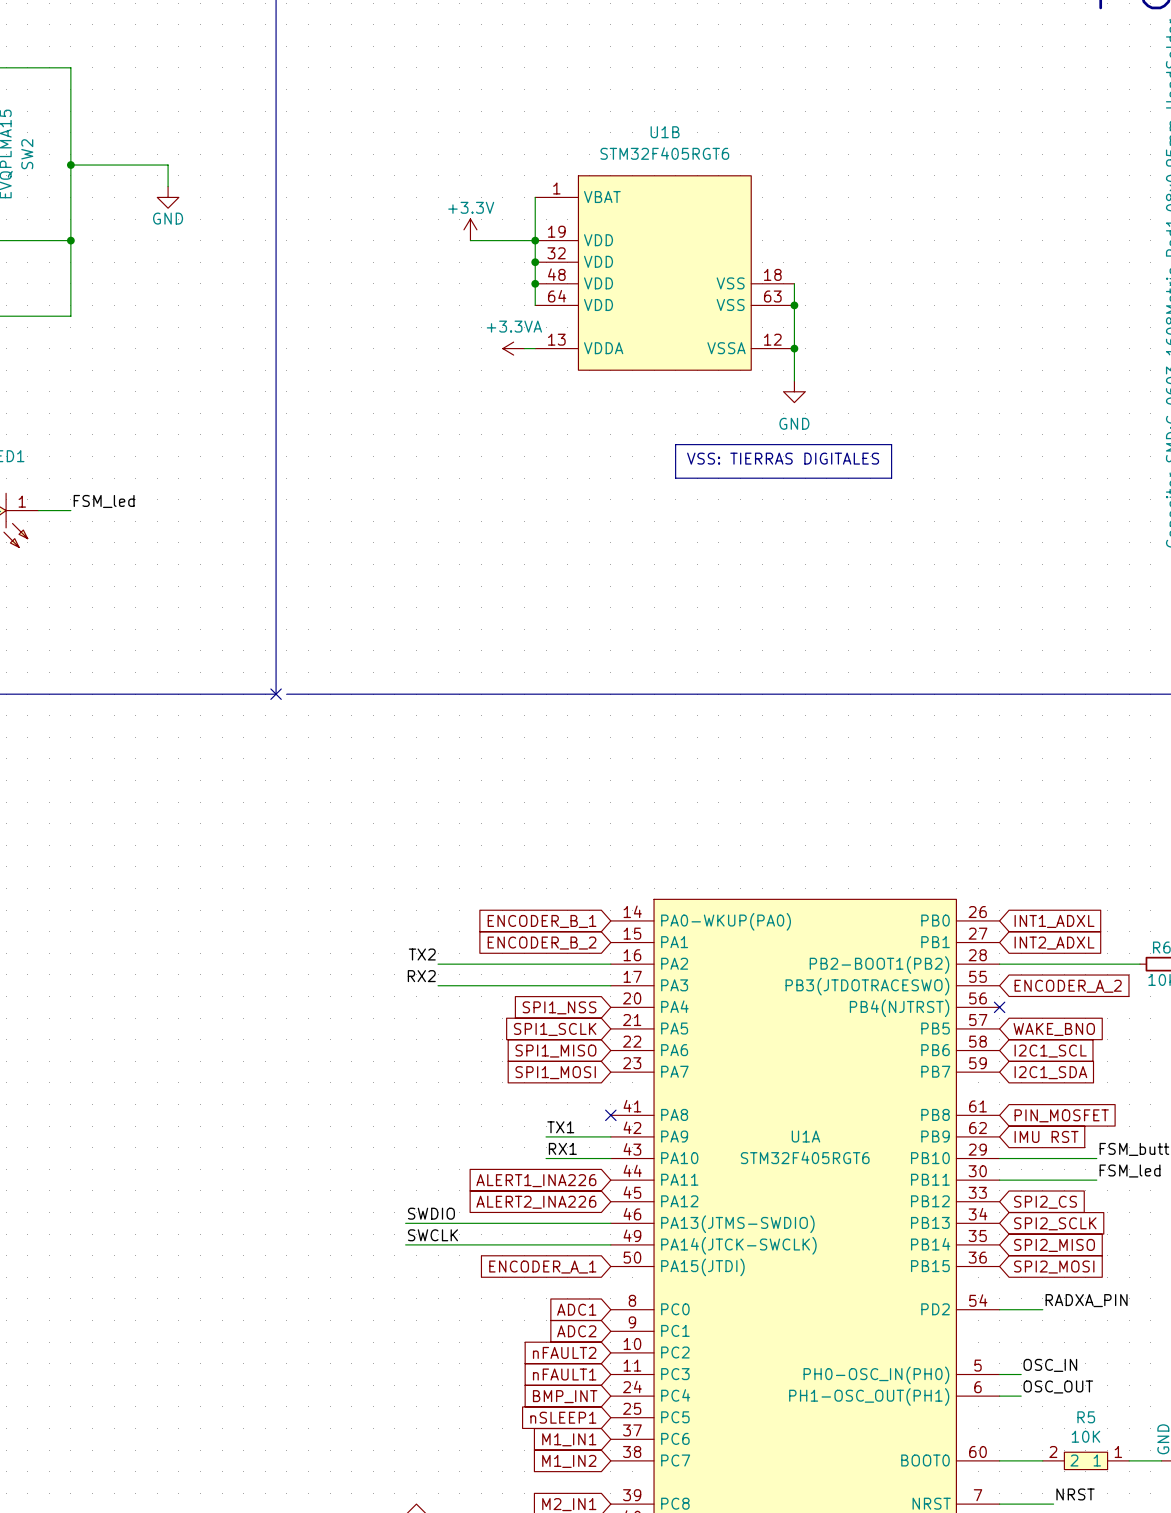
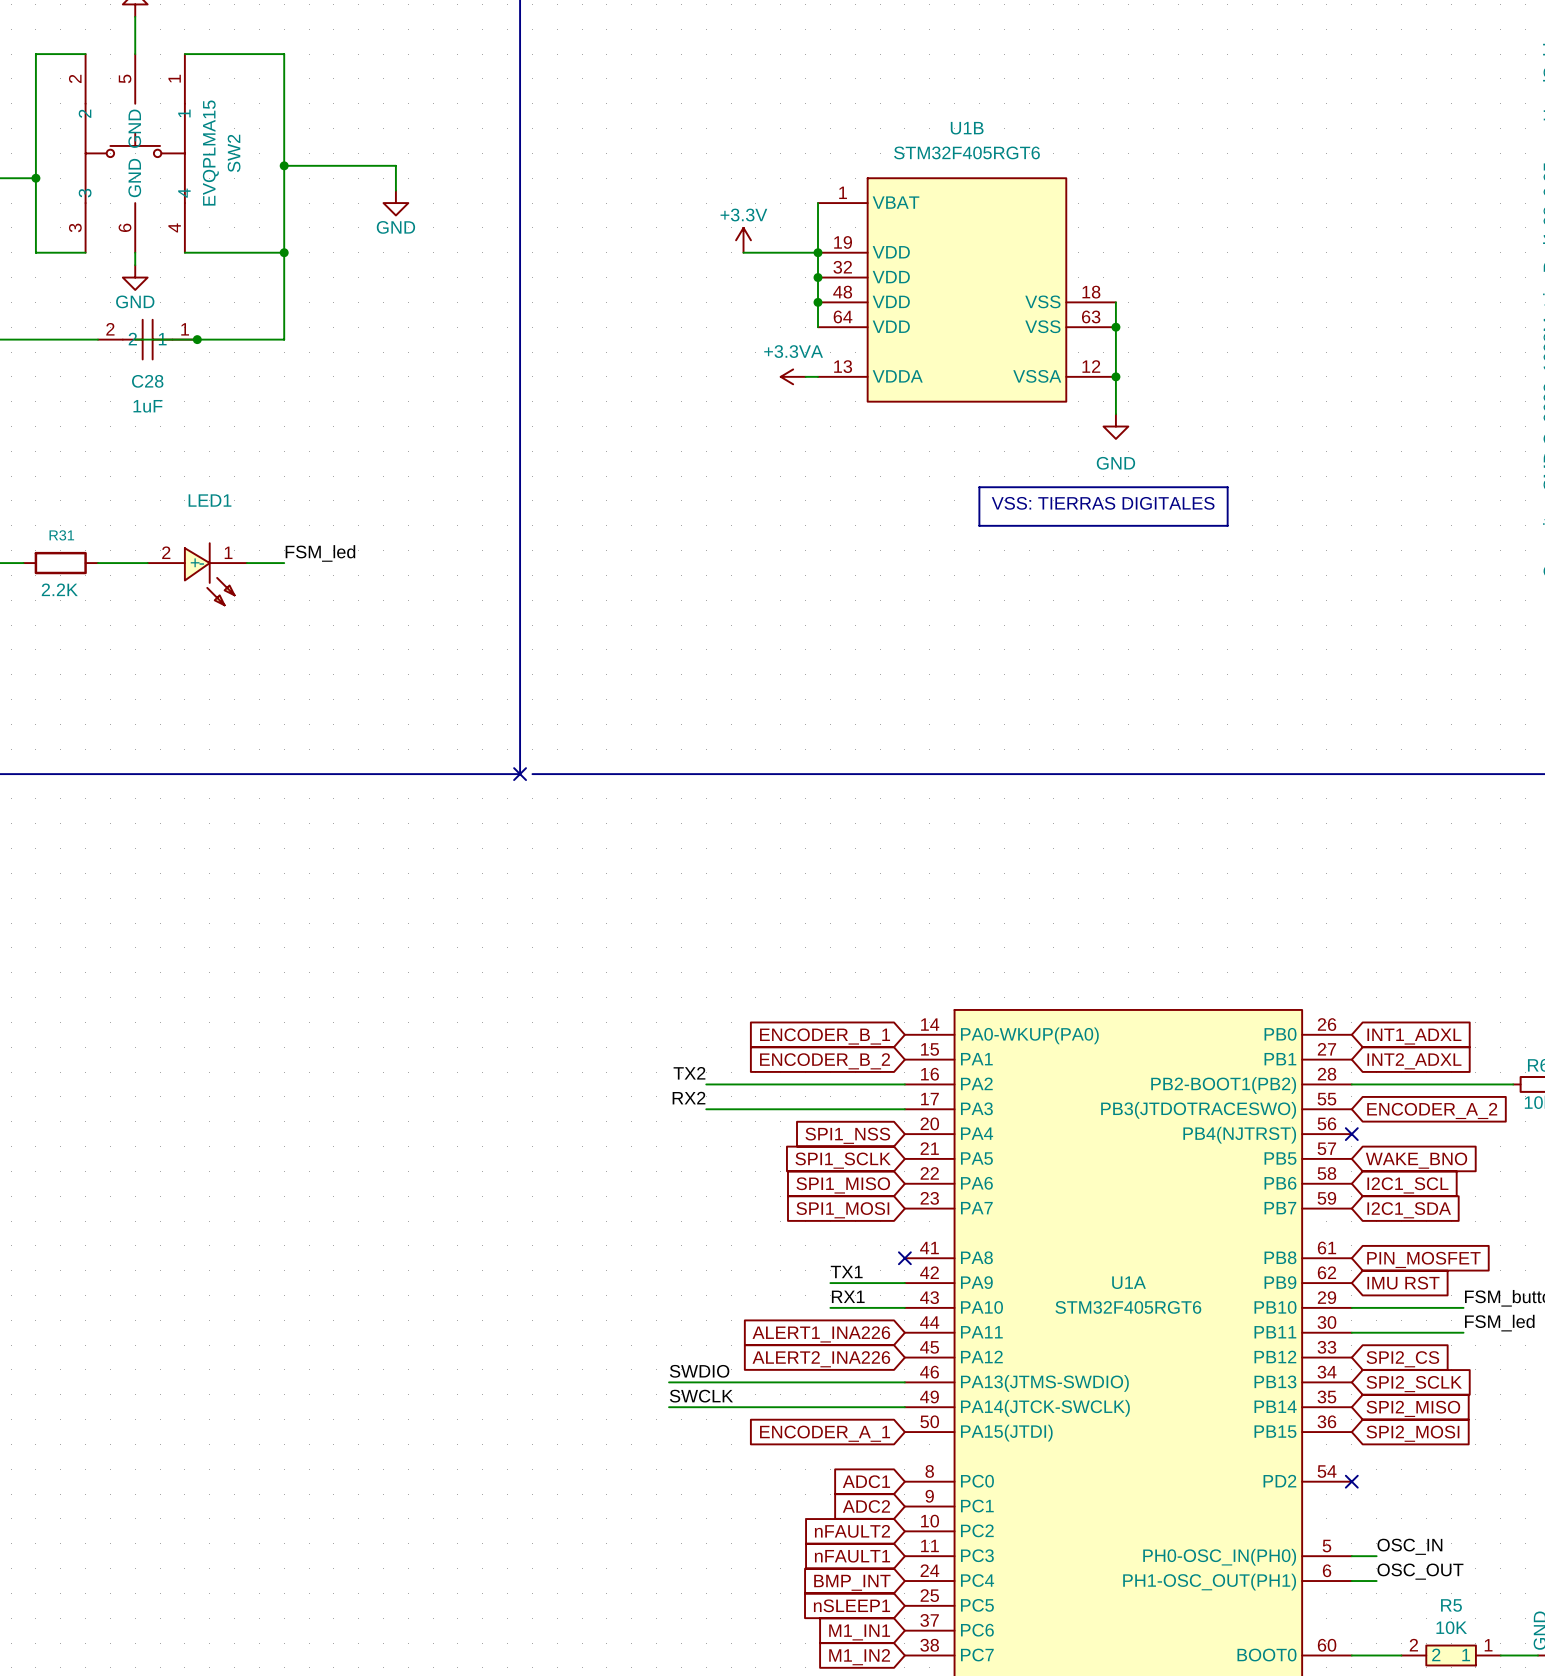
label: RADXA_PIN (1086, 1300) -> none
wire: (999, 1309) (1042, 1309) -> none
no-connect mark: none -> (1351, 1481)

